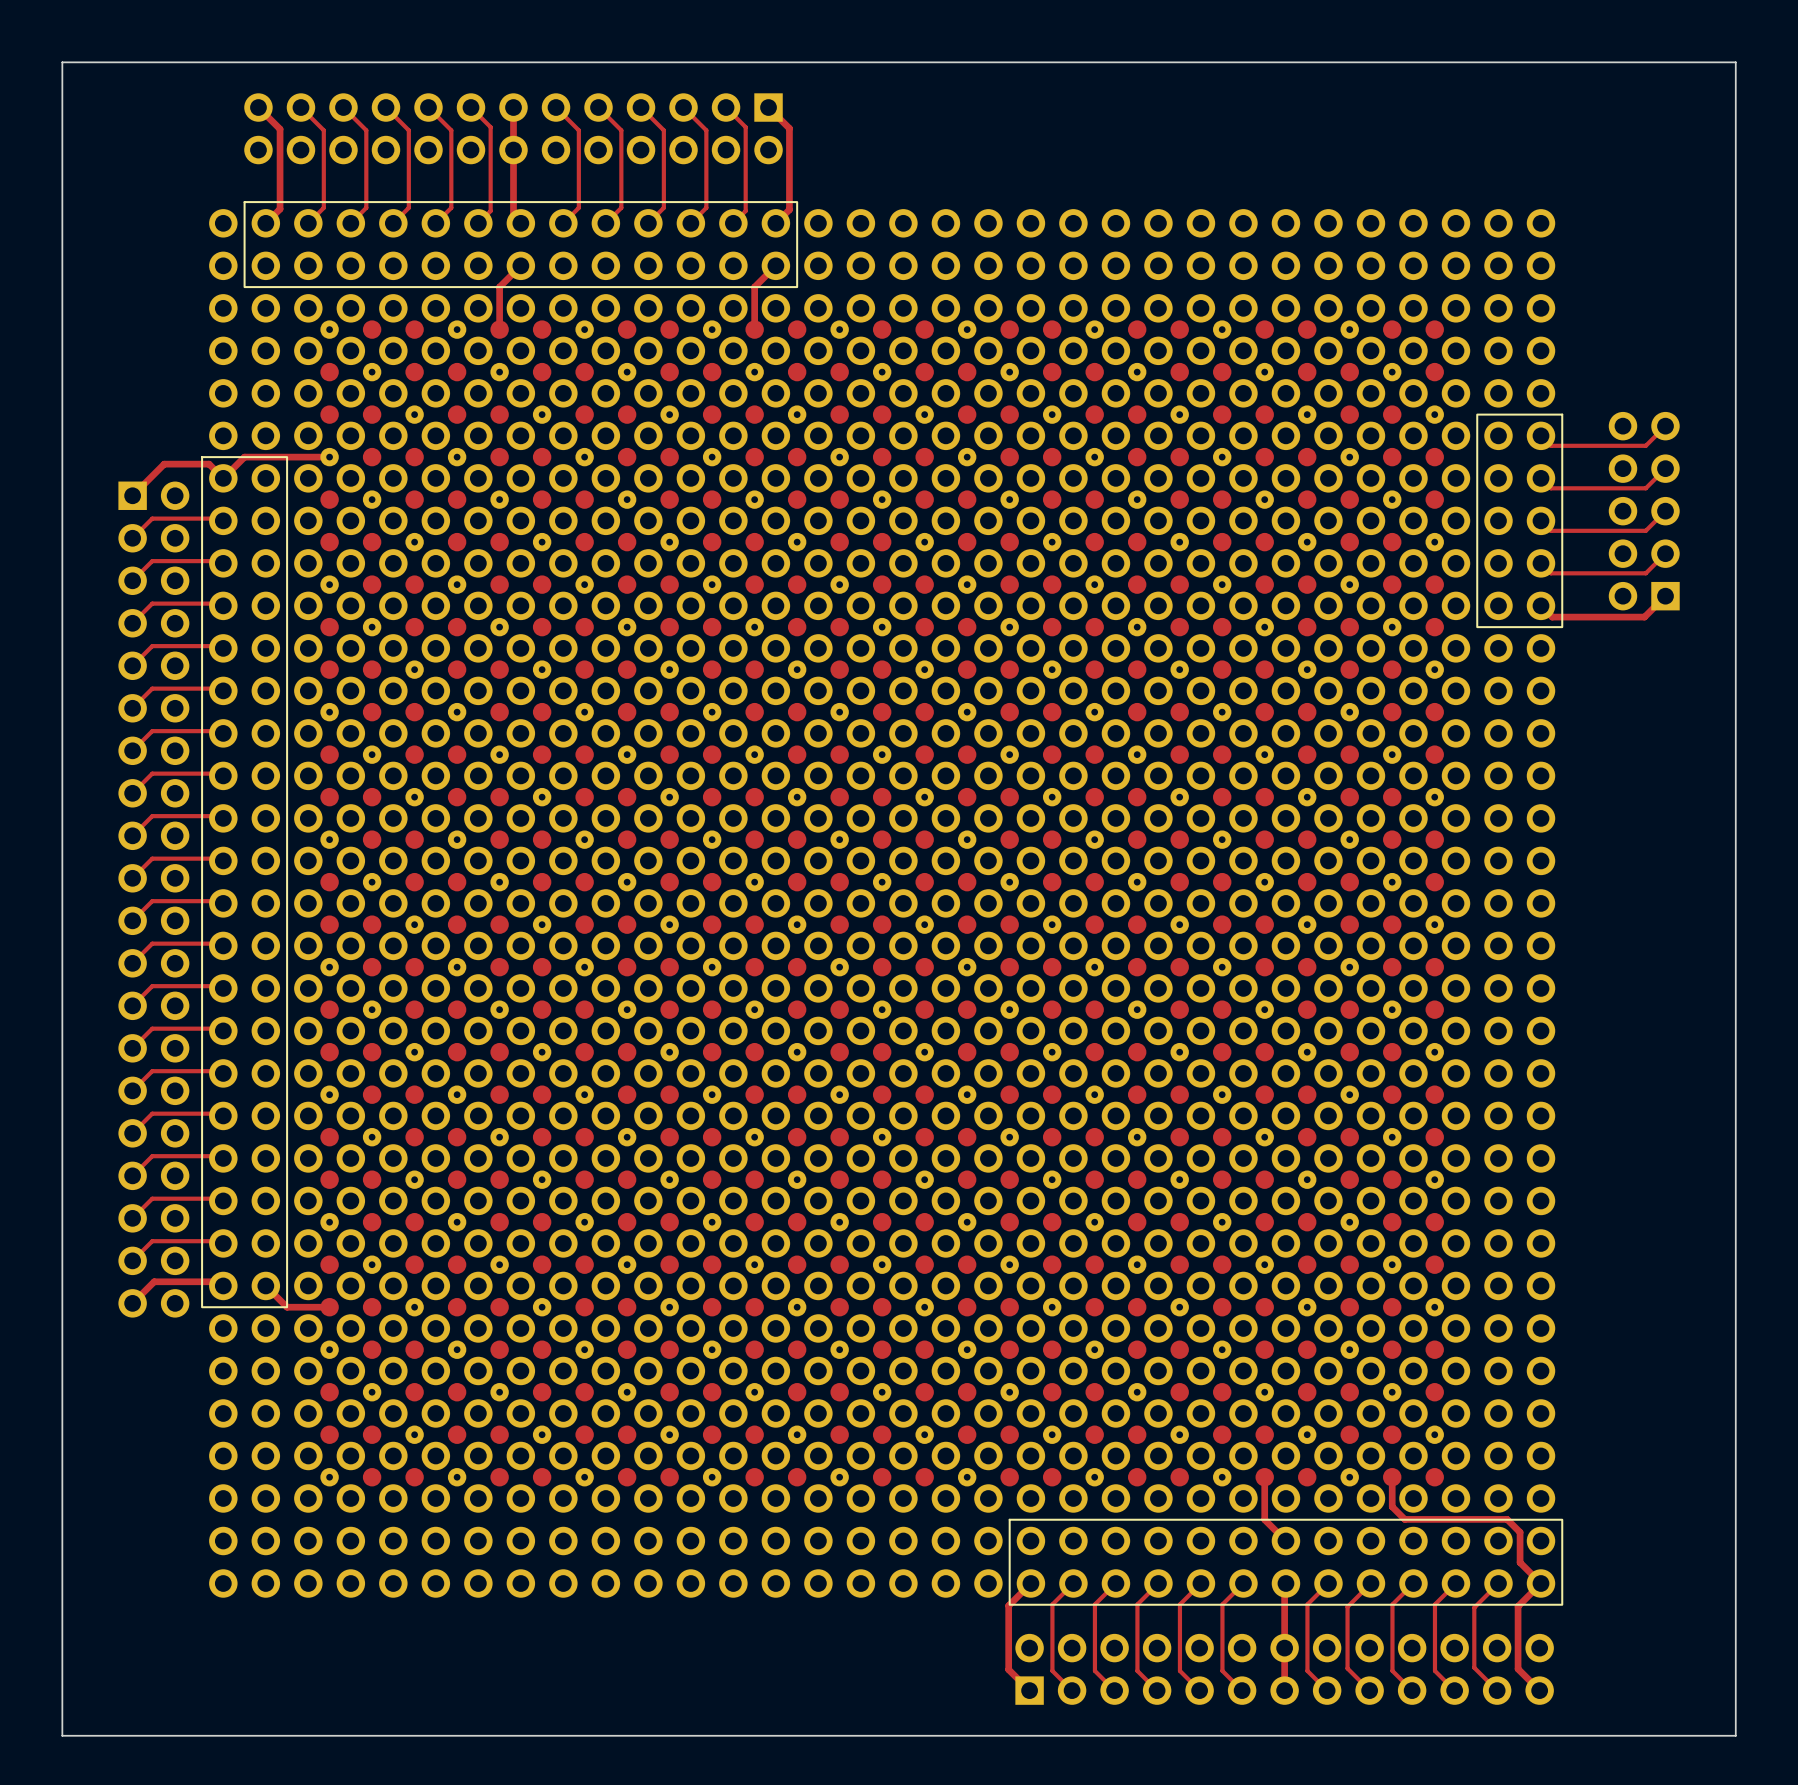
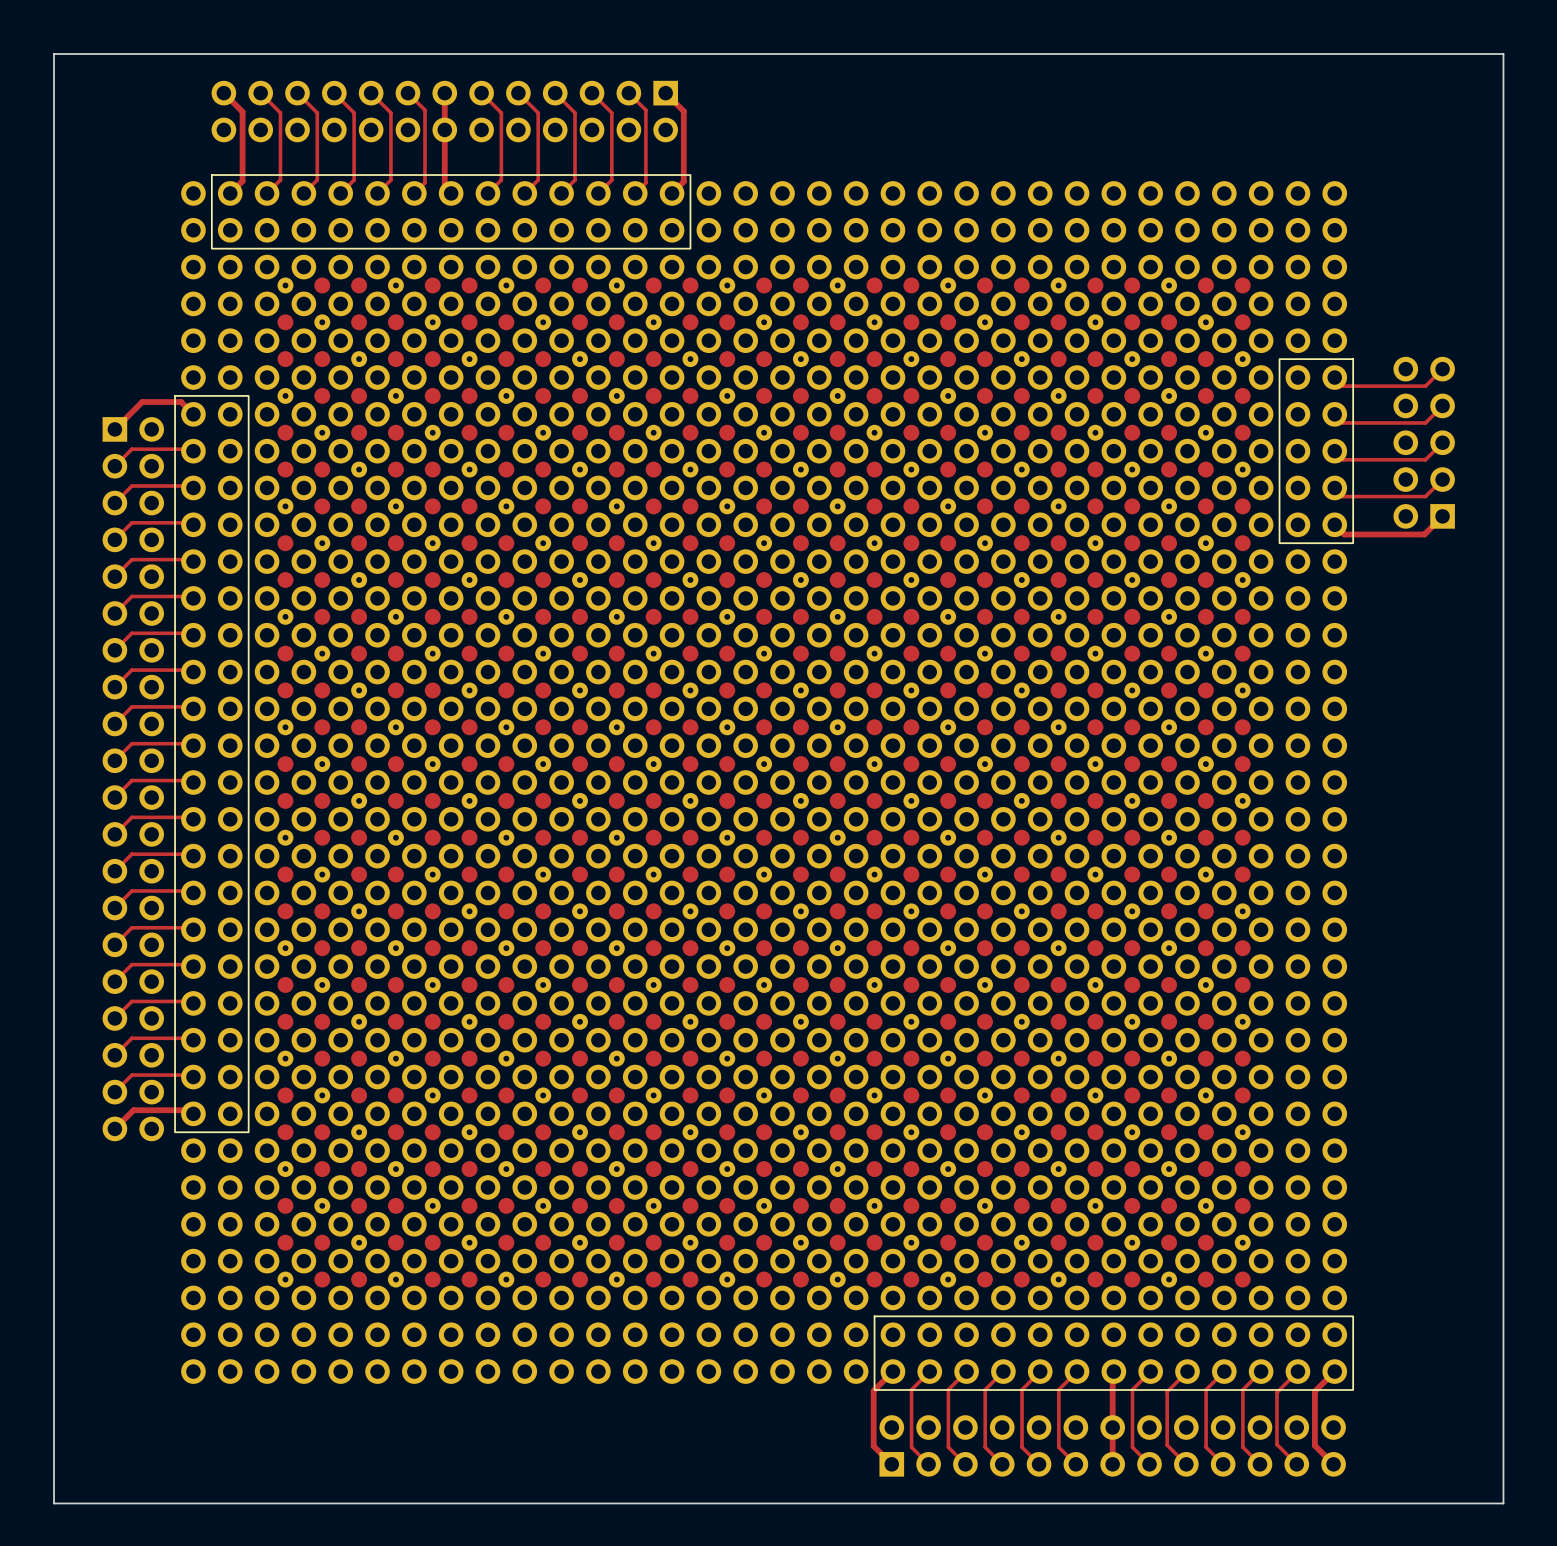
track: (520, 265) (499, 287) (499, 329) -> none
track: (775, 265) (754, 287) (754, 329) -> none
track: (329, 457) (244, 457) (223, 478) -> none
track: (265, 1285) (287, 1307) (329, 1307) -> none
track: (1264, 1477) (1264, 1519) (1285, 1540) -> none
track: (1392, 1477) (1392, 1506) (1404, 1519) (1507, 1519) (1520, 1532) (1520, 1562) (1540, 1583) -> none

